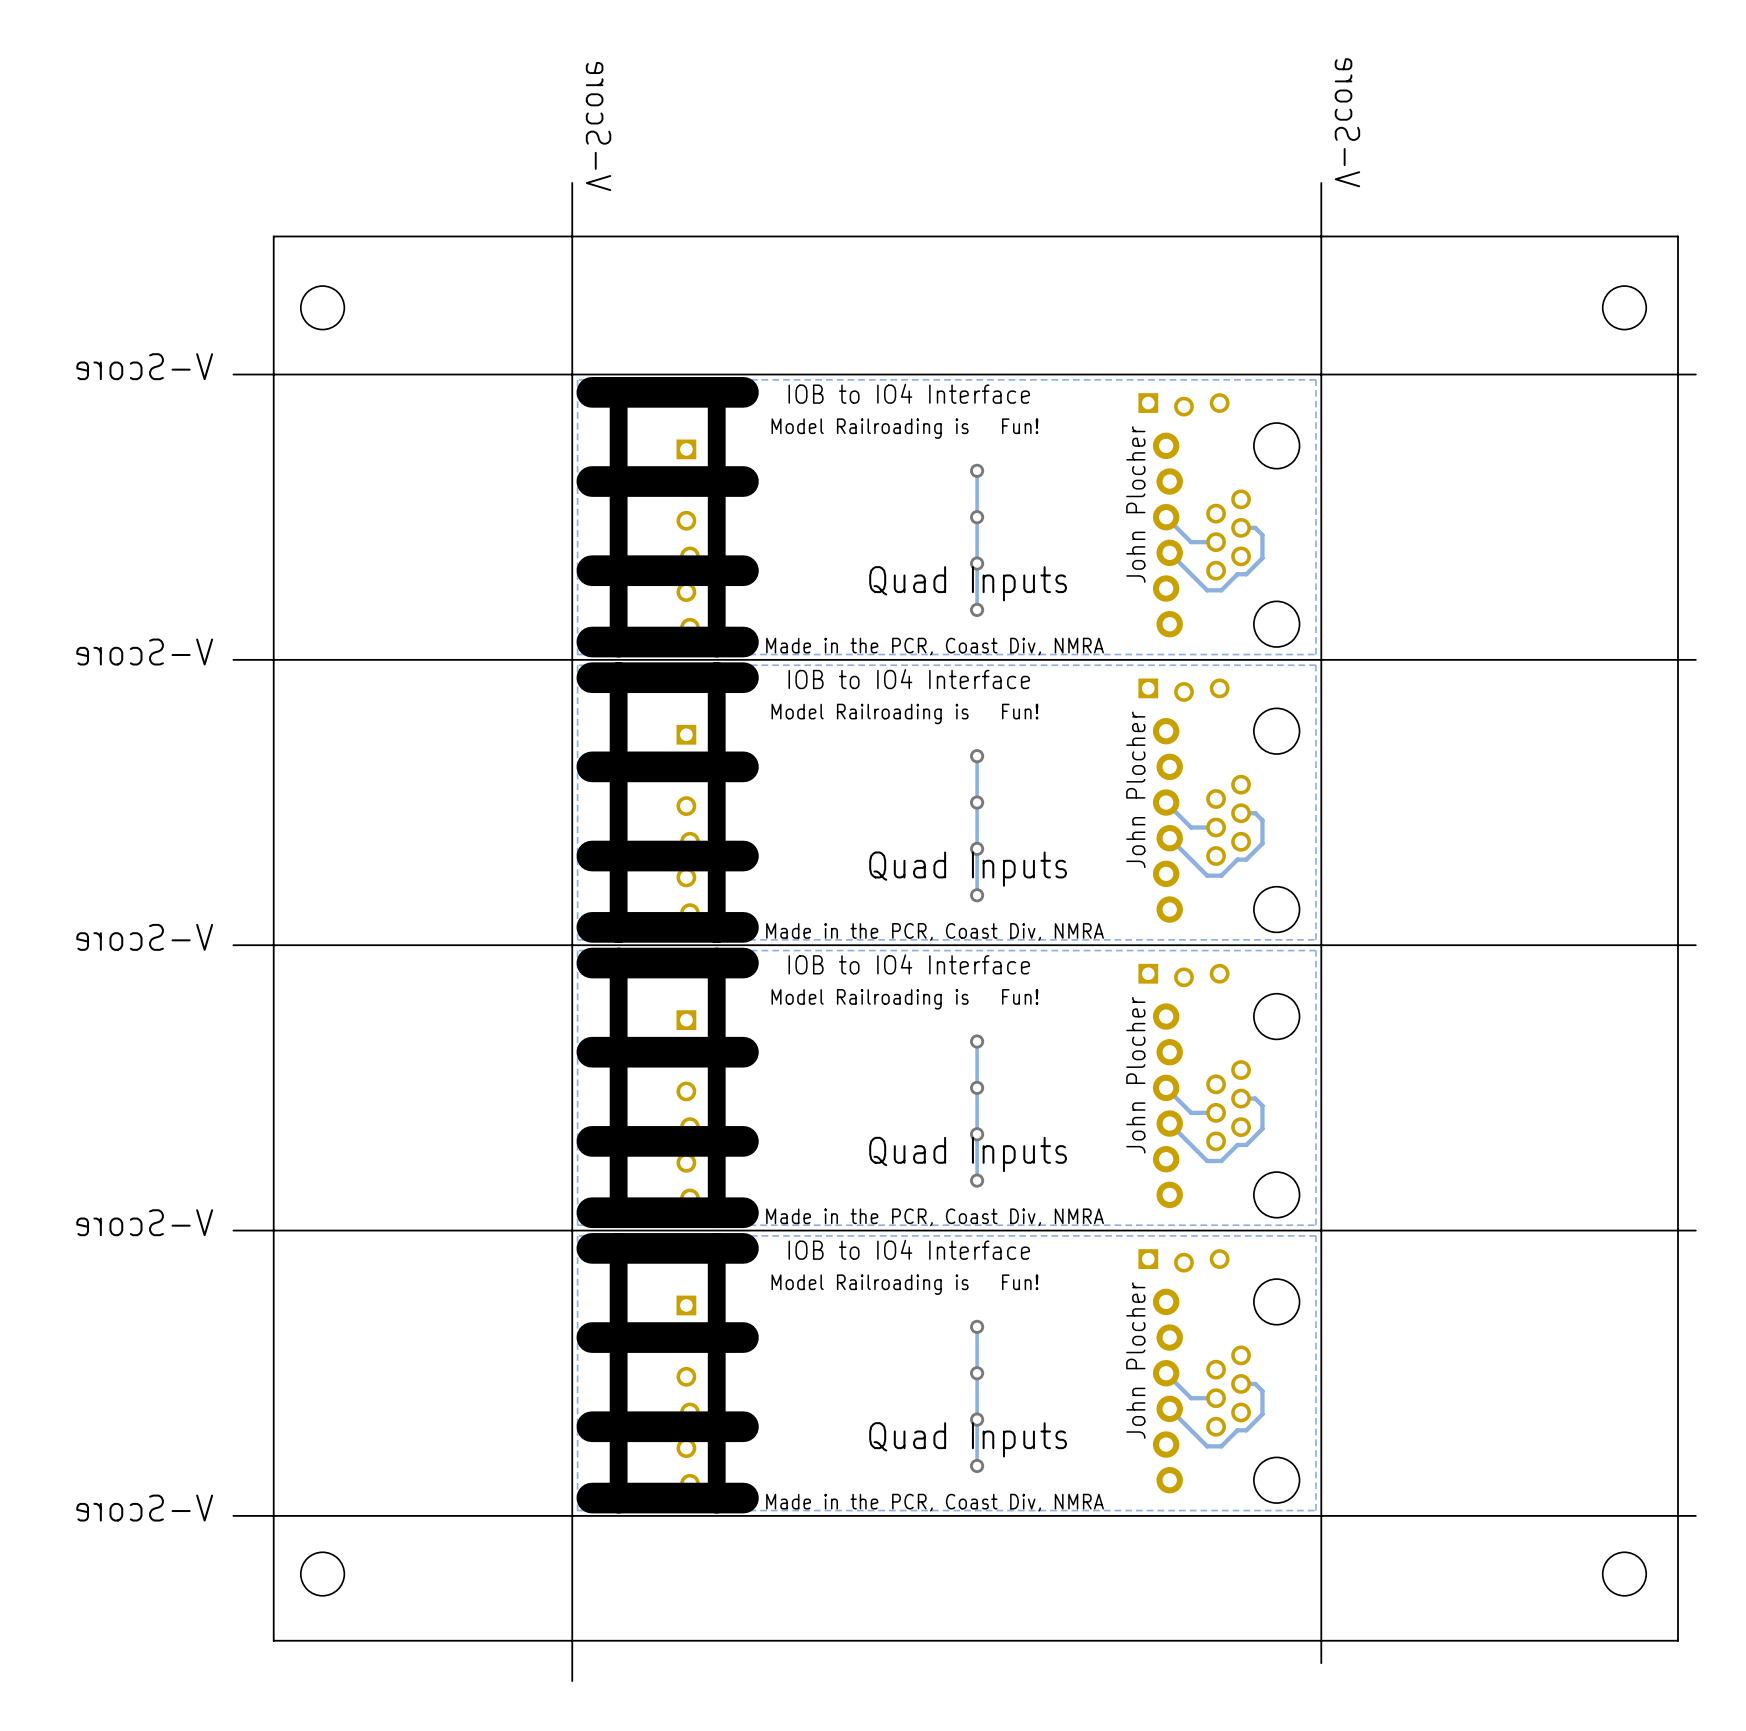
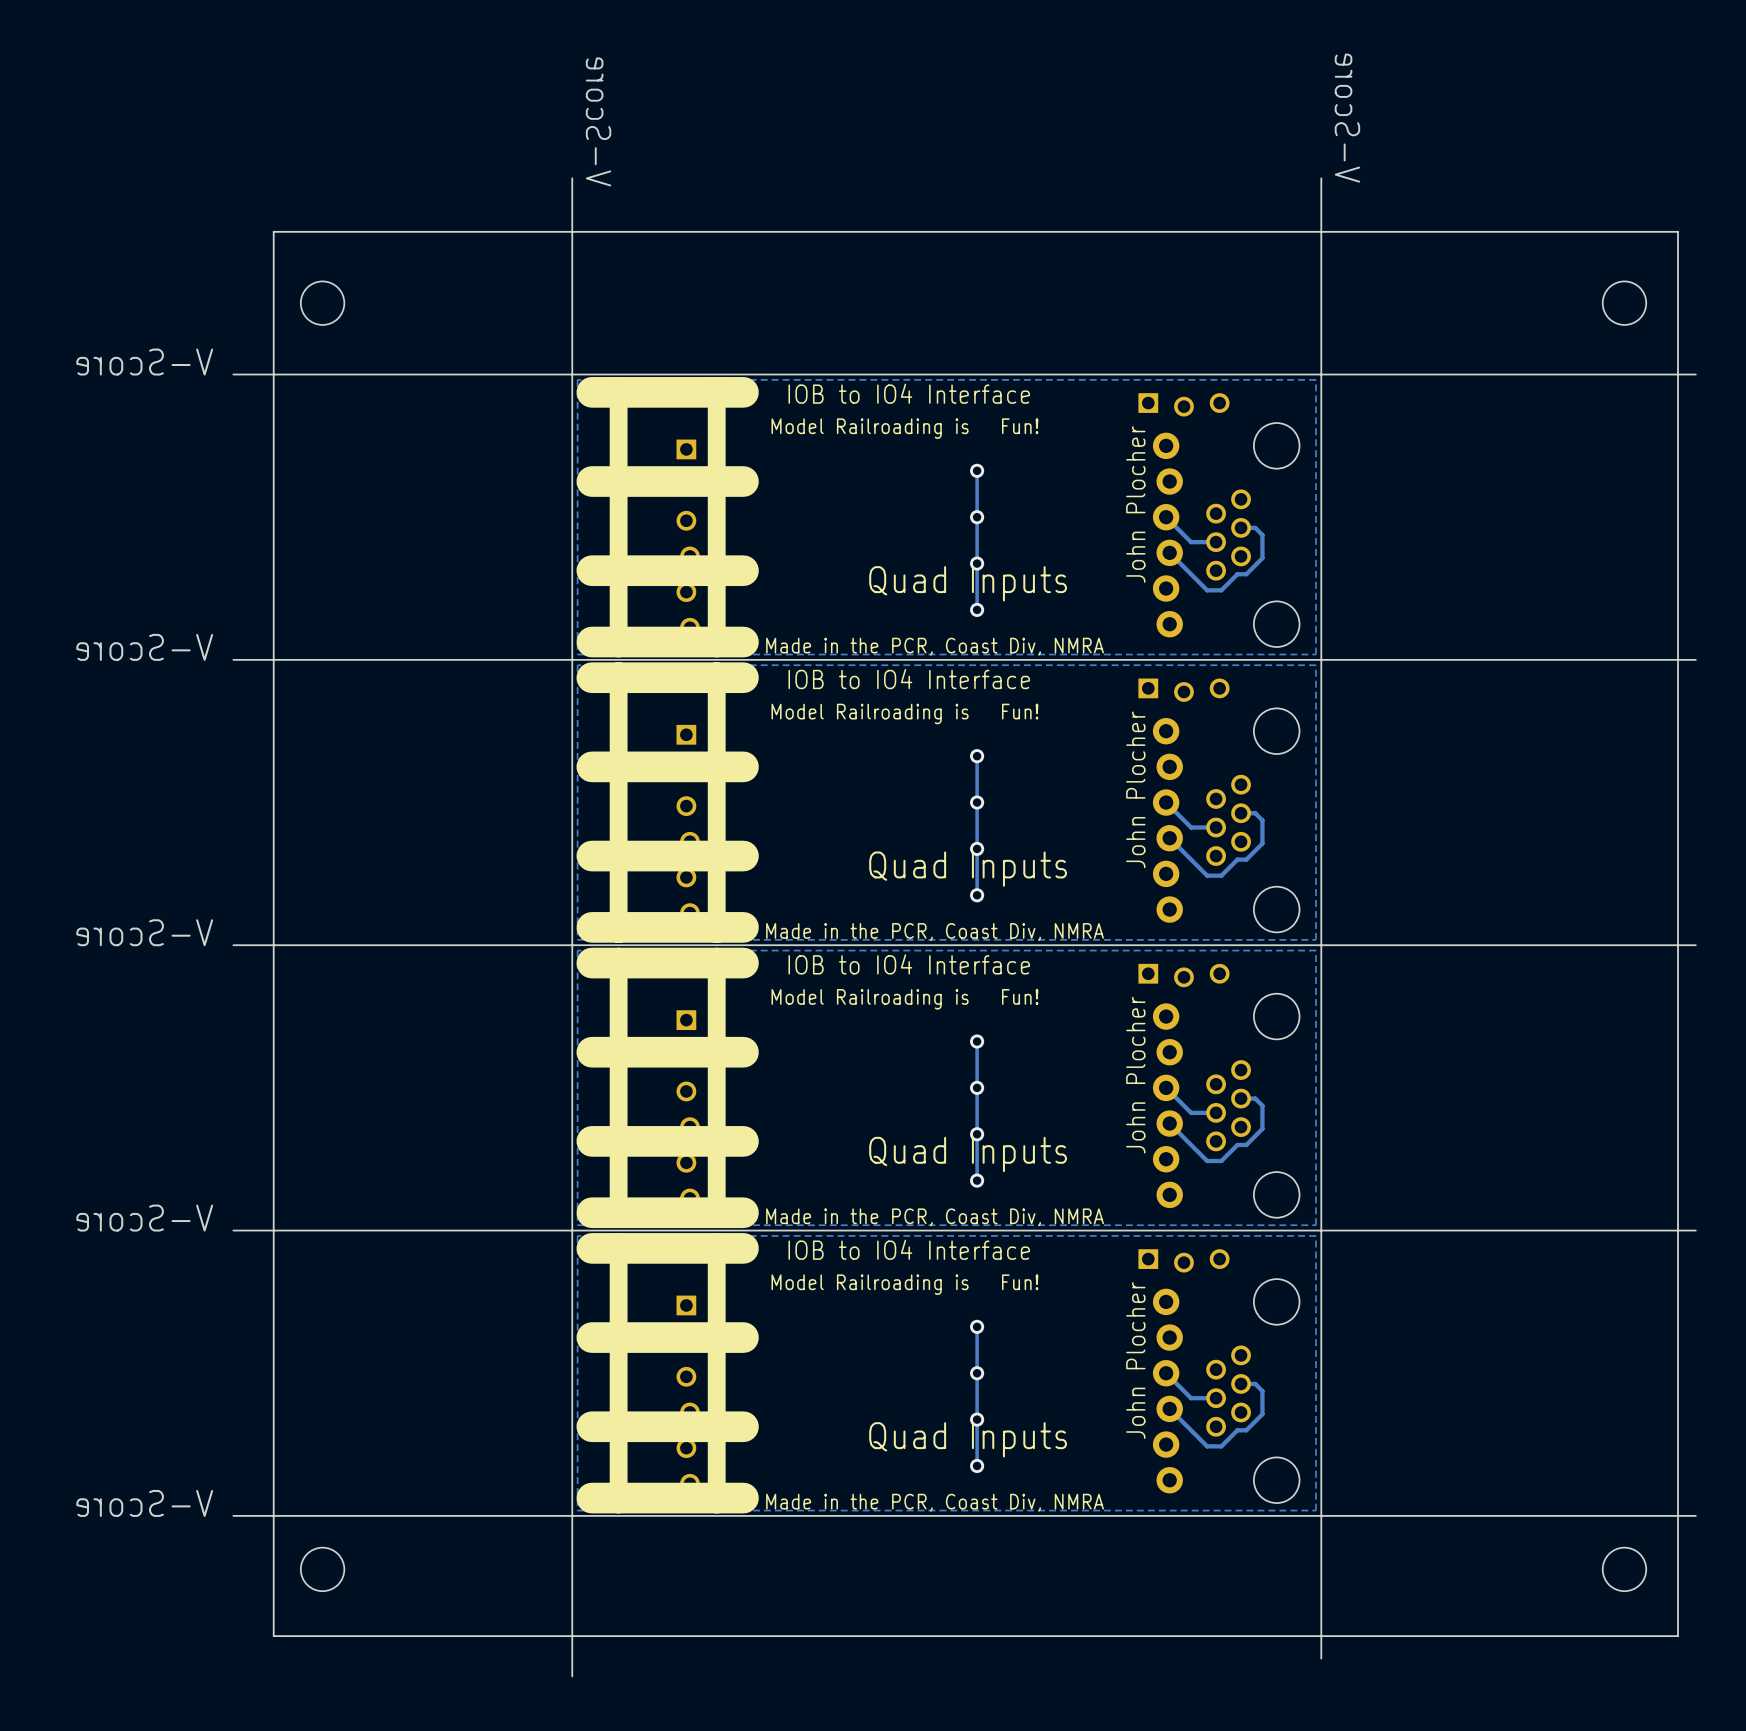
part footprint: [232, 182, 1697, 1682] -> [232, 177, 1697, 1678]

